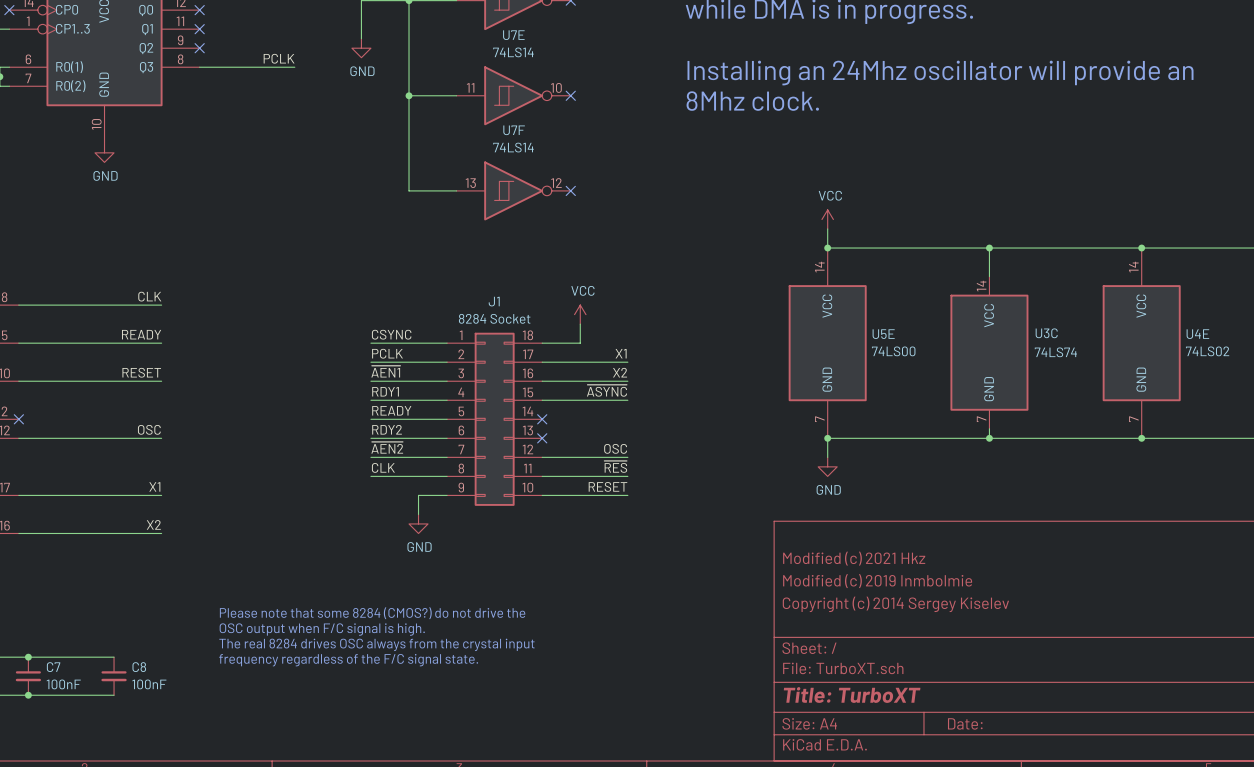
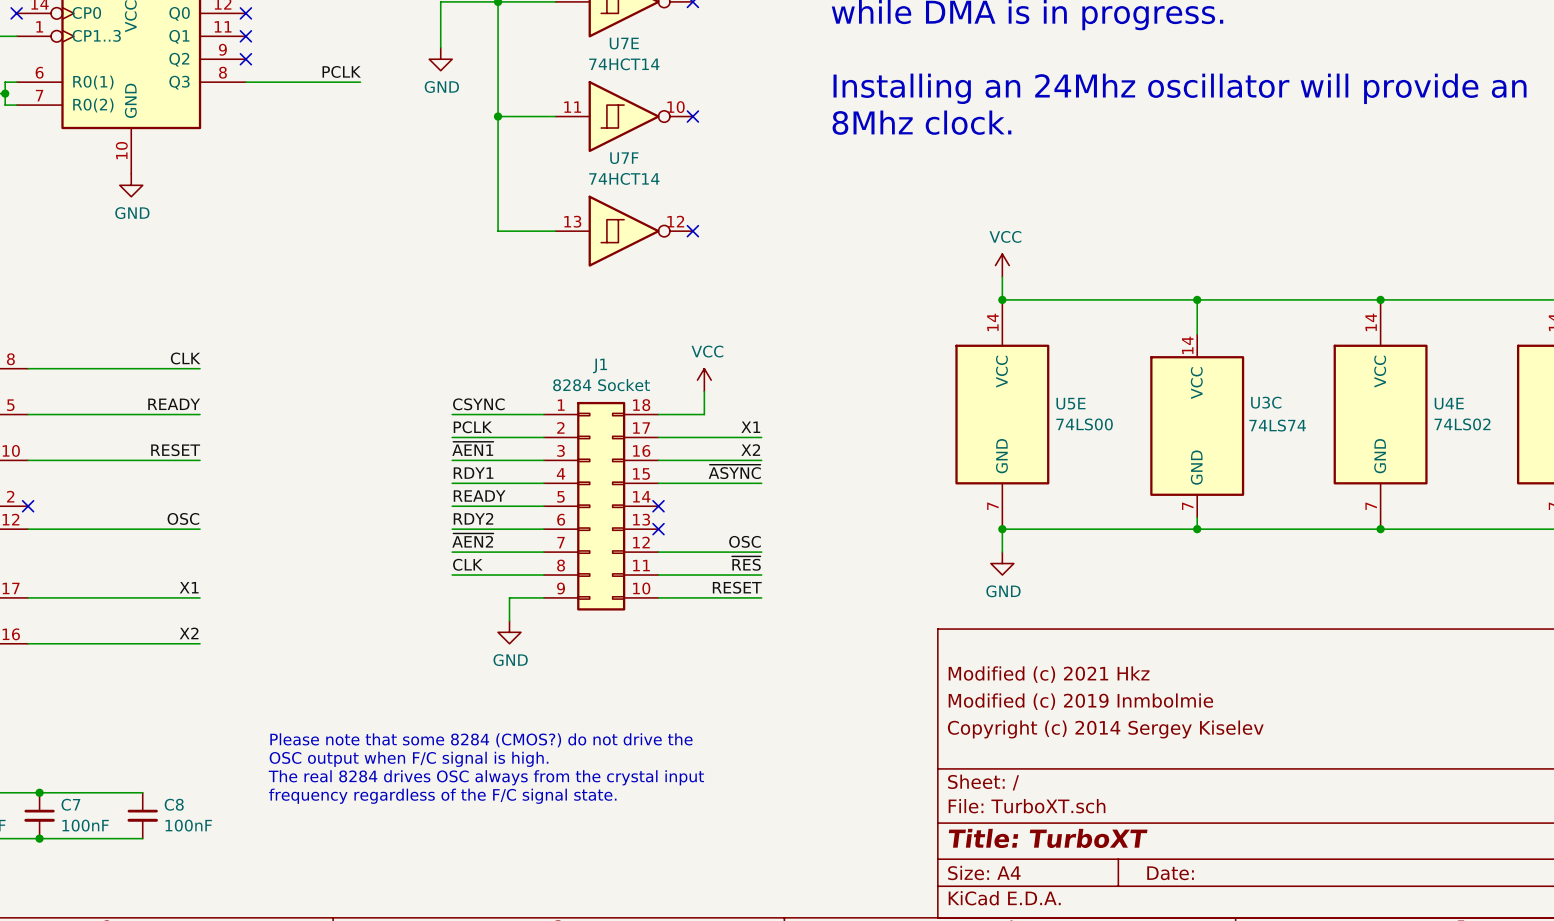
U7E value: 74LS14 (513, 52) -> 74HCT14 (624, 64)
U7F value: 74LS14 (513, 147) -> 74HCT14 (624, 178)

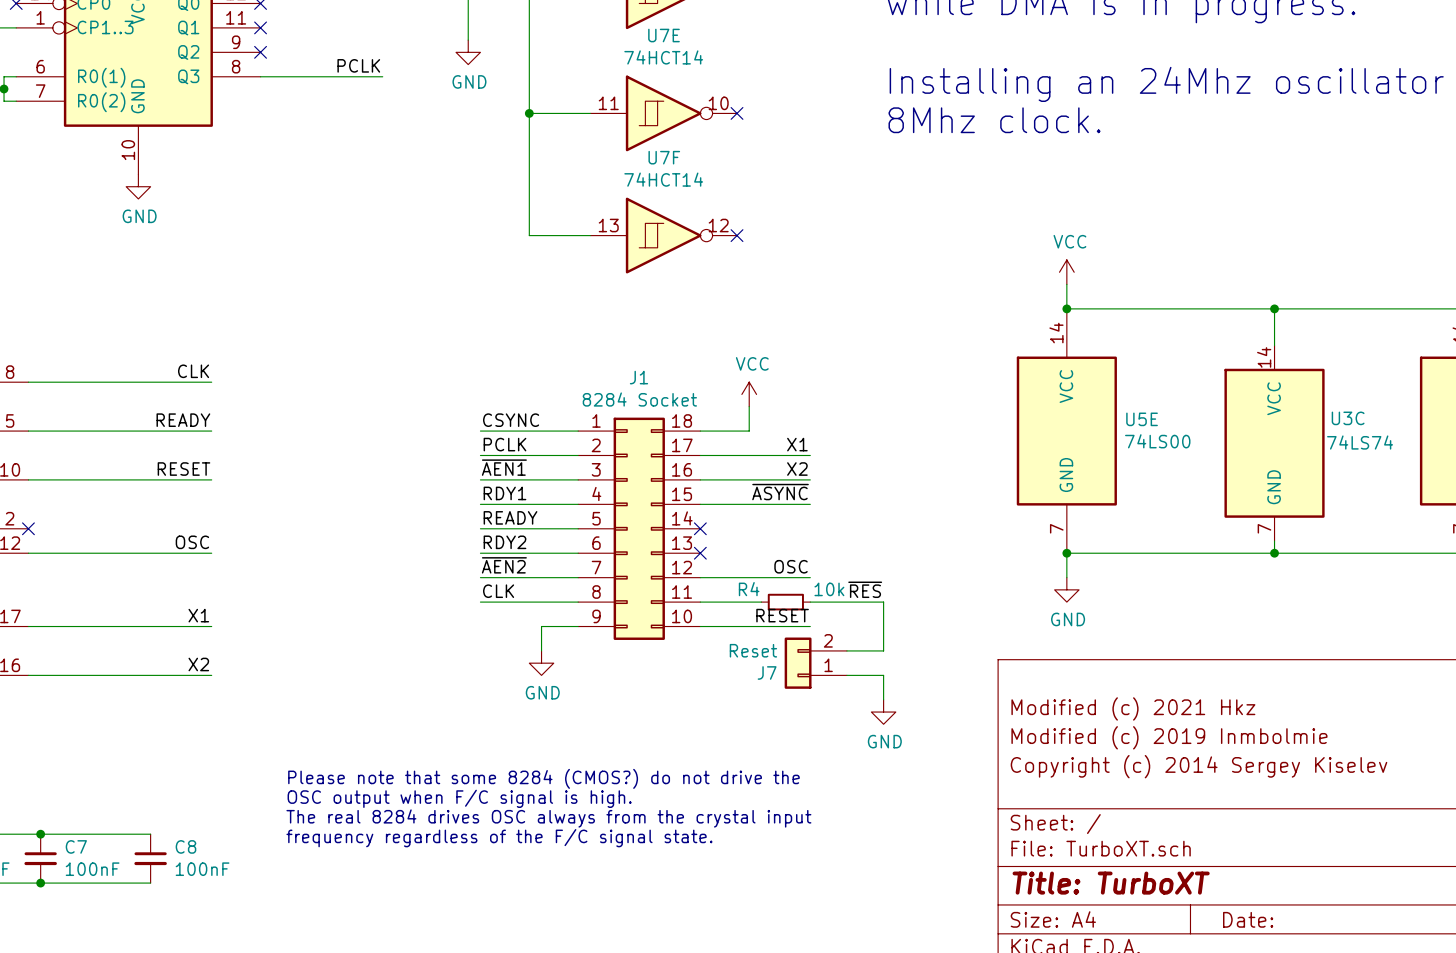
label position: ~{RES} (746, 563) -> ~{RES} (865, 589)
wire: (715, 575) (761, 575) -> (846, 650) (883, 650) (883, 602) (810, 602)
R4: none -> 10k (785, 602)
J7: none -> Reset (815, 663)
wire: none -> (846, 675) (883, 675) (883, 699)
power symbol: none -> GND (883, 712)

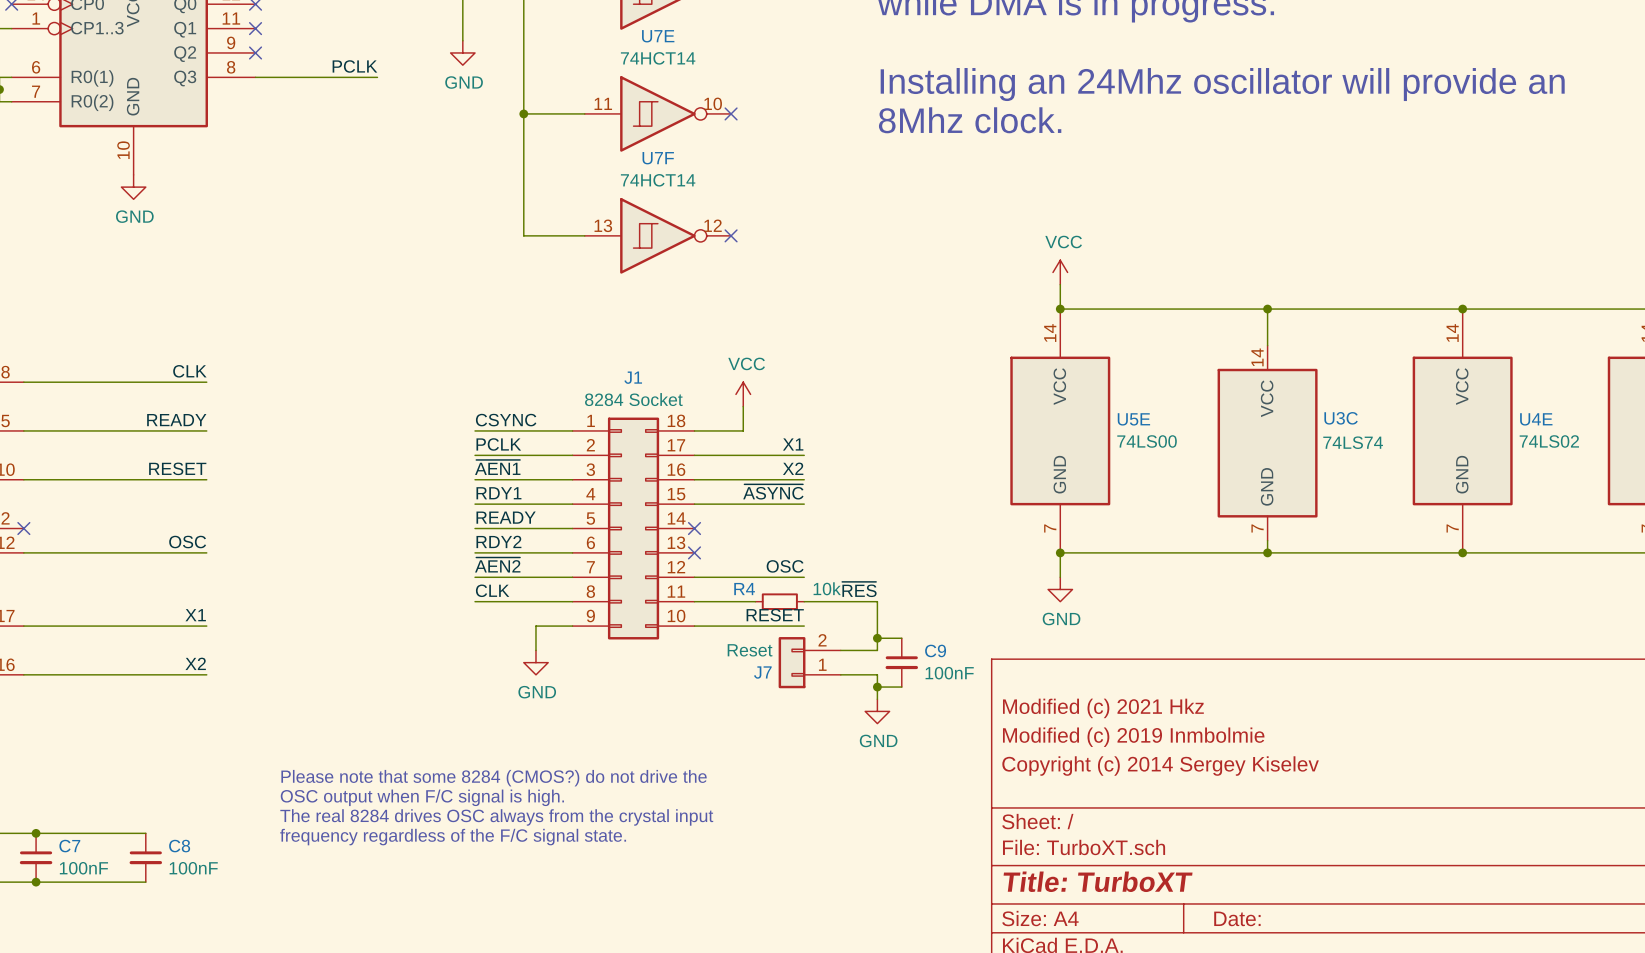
wire: none -> (877, 638) (901, 638)
junction: none -> (877, 638)
C9: none -> 100nF (901, 662)
wire: none -> (877, 687) (901, 687)
junction: none -> (877, 687)

